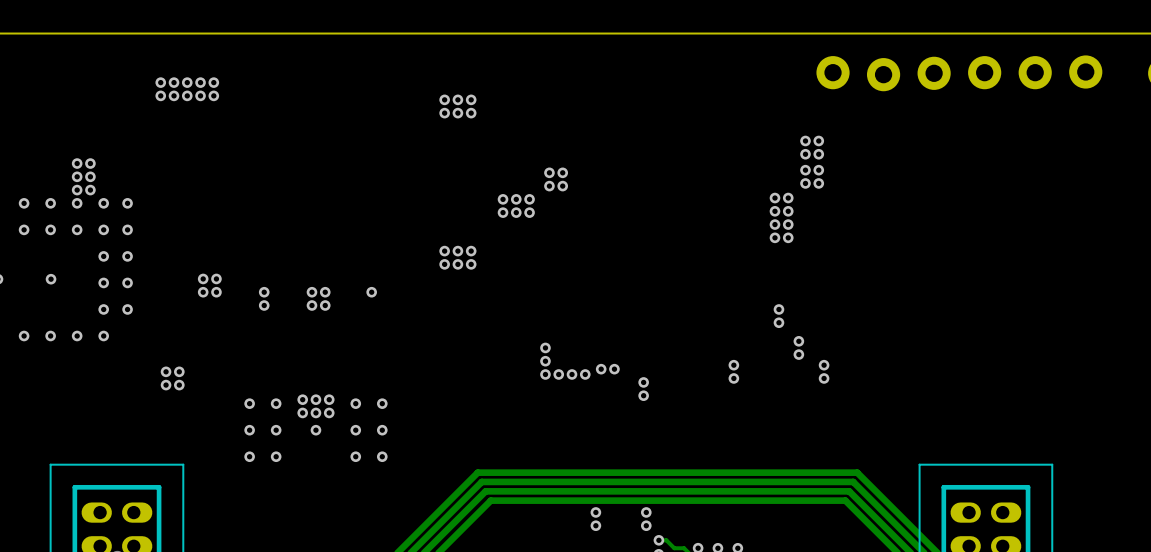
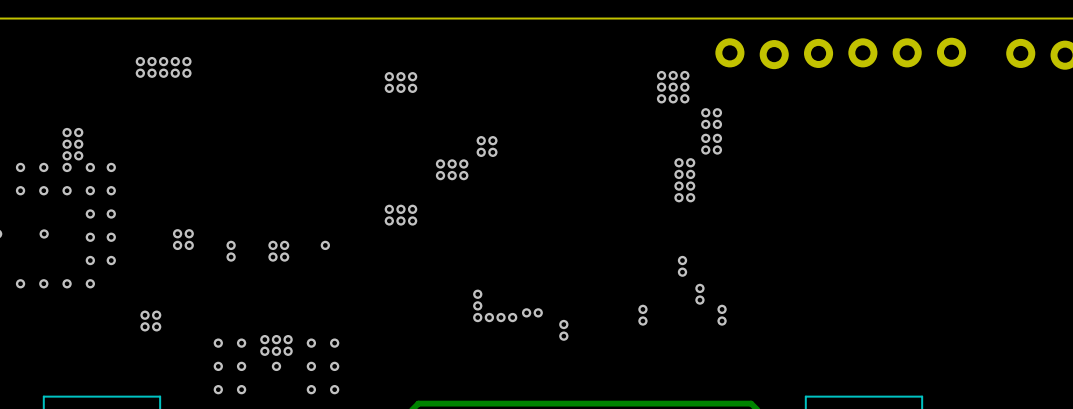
via: none -> (661, 75)
via: none -> (673, 75)
via: none -> (684, 75)
via: none -> (661, 87)
via: none -> (673, 87)
via: none -> (684, 87)
via: none -> (661, 98)
via: none -> (673, 98)
via: none -> (684, 98)

